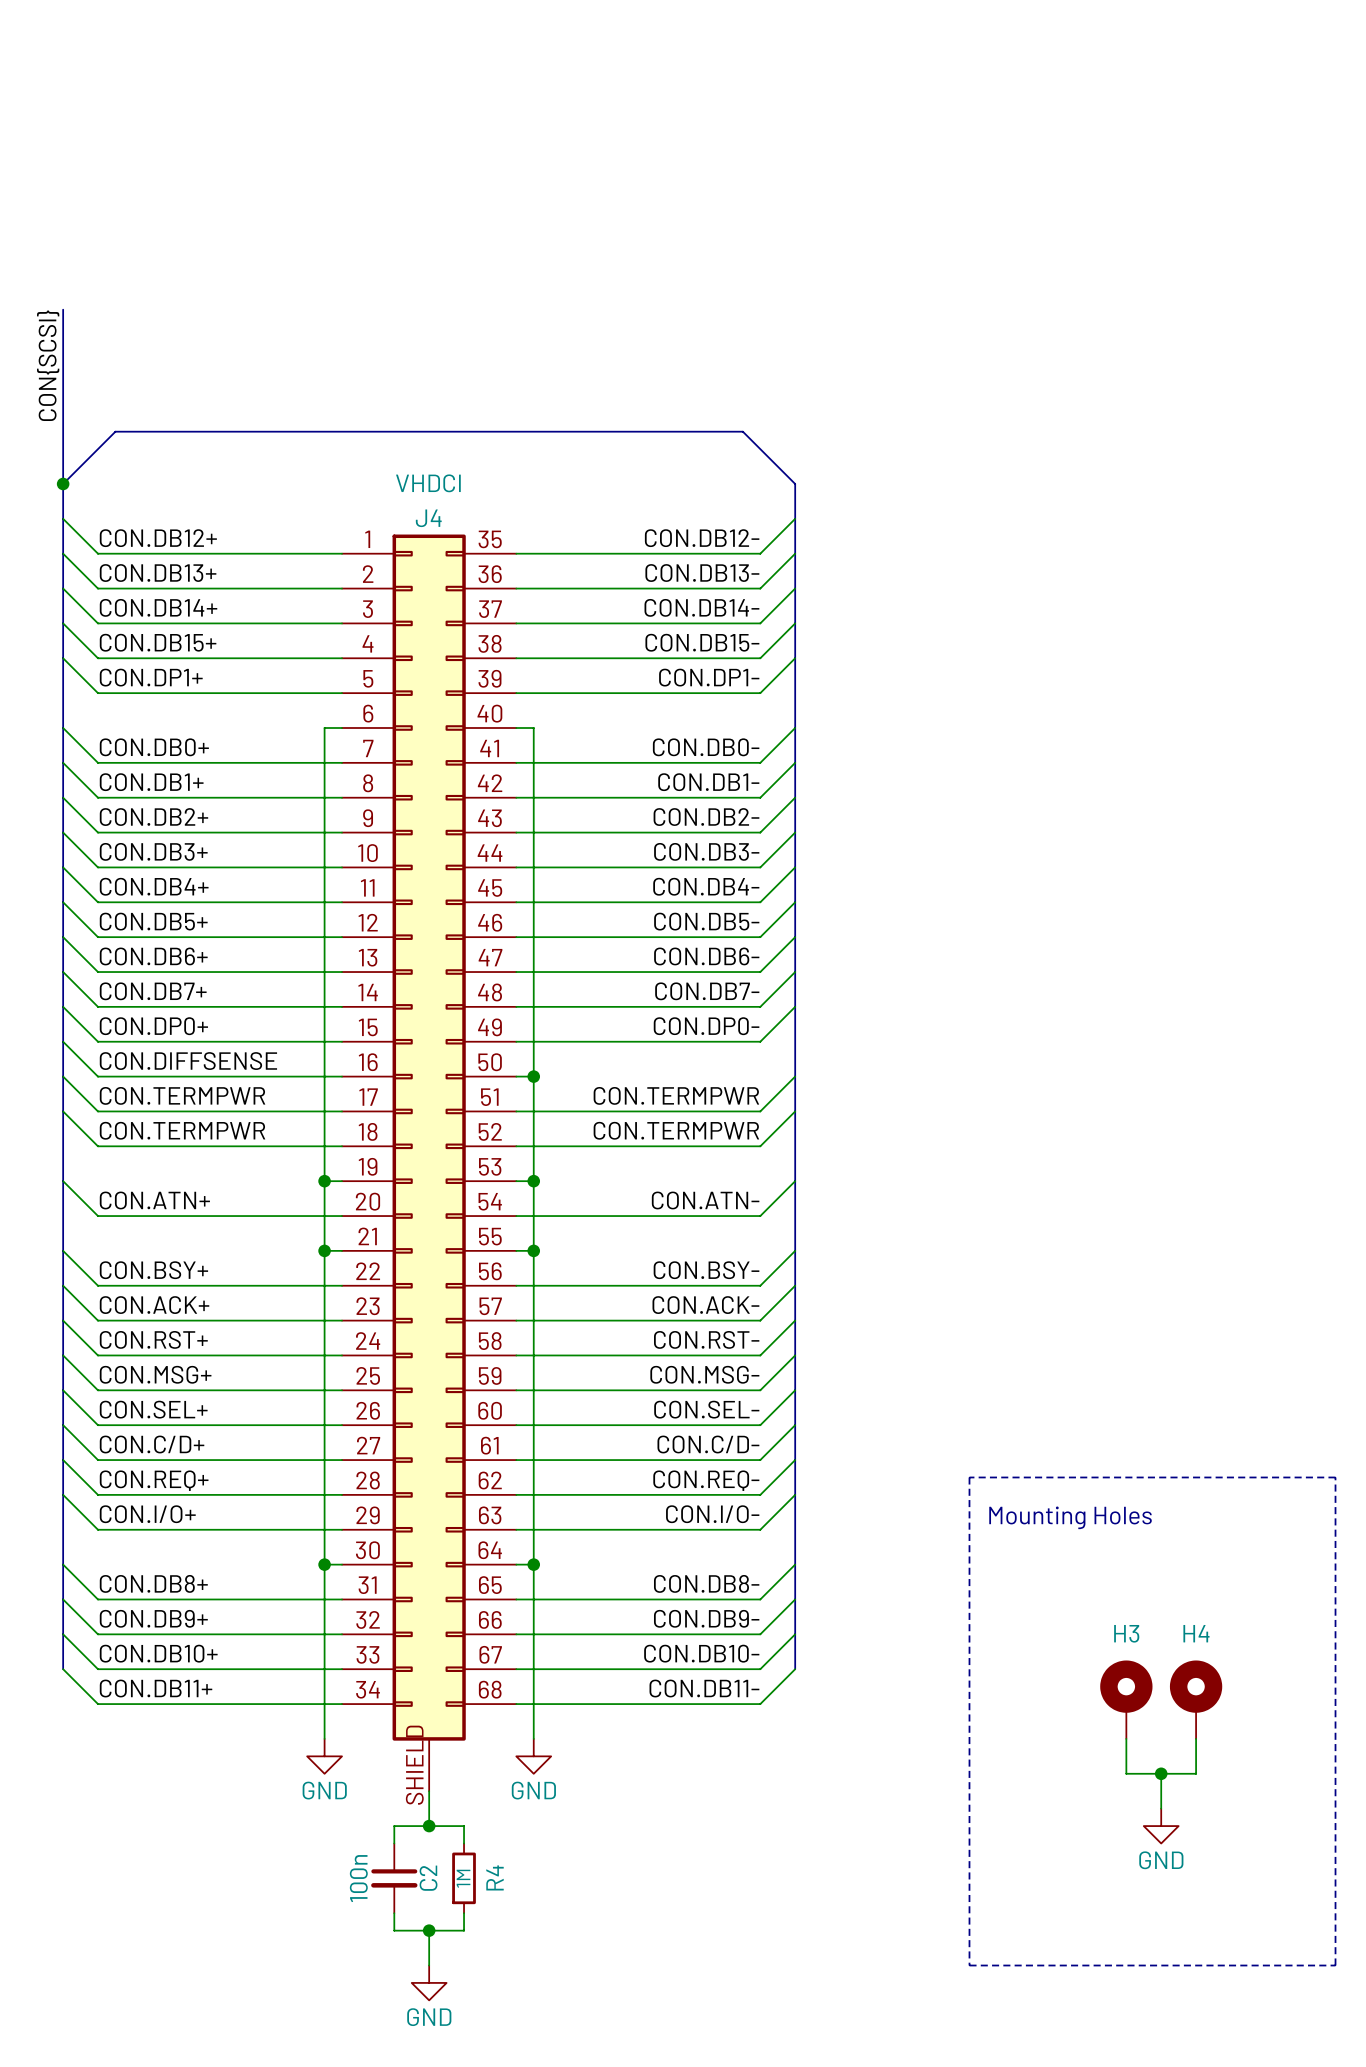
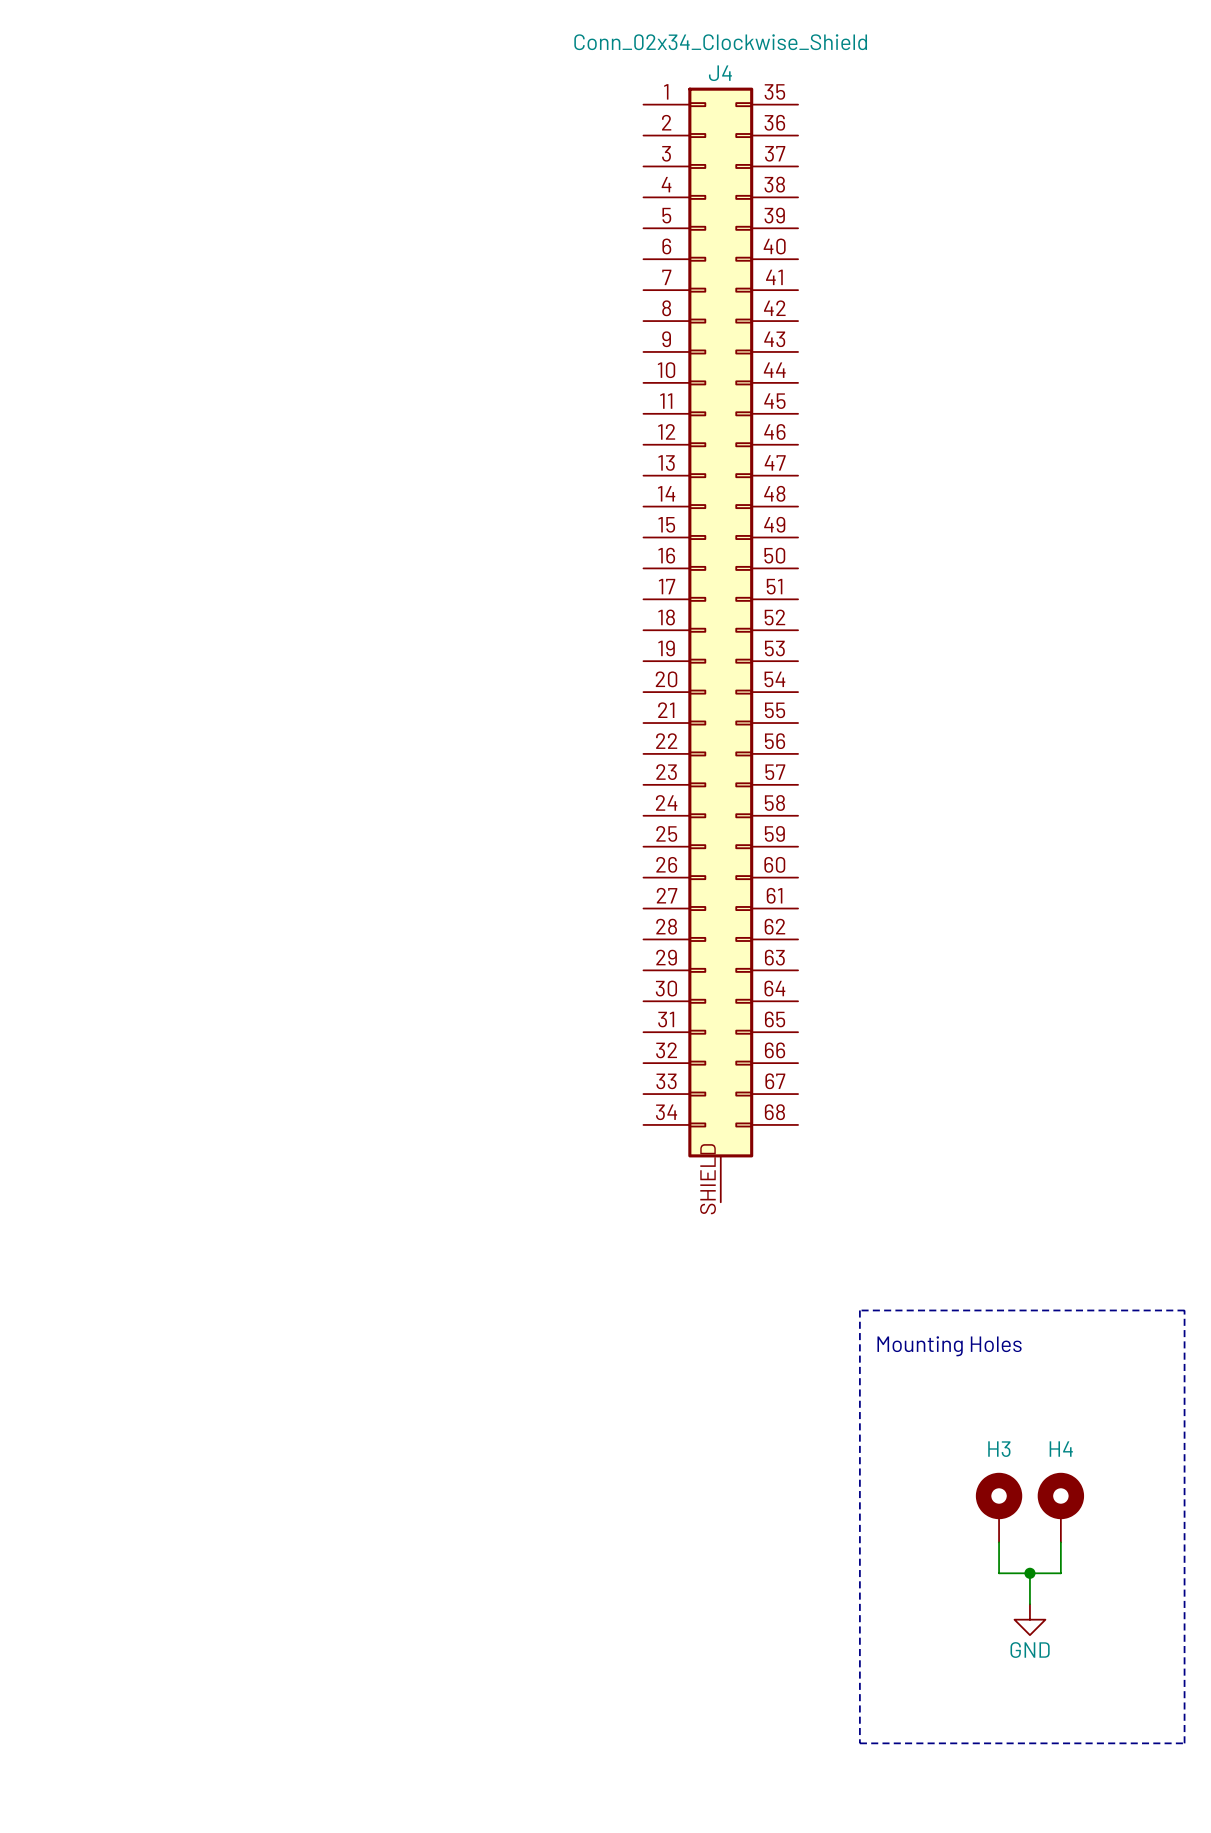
bus: (63, 309) (63, 1669) -> none
label: CON{SCSI} (48, 365) -> none
bus: (63, 483) (115, 431) (742, 431) (795, 483) (795, 1669) -> none
junction: (63, 483) -> none
J4 value: VHDCI (428, 483) -> Conn_02x34_Clockwise_Shield (720, 42)
wire: (63, 518) (98, 553) (342, 553) -> none
wire: (795, 518) (760, 553) (516, 553) -> none
label: CON.DB12+ (158, 538) -> none
label: CON.DB12- (702, 538) -> none
wire: (63, 553) (98, 588) (342, 588) -> none
wire: (795, 553) (760, 588) (516, 588) -> none
label: CON.DB13+ (158, 573) -> none
label: CON.DB13- (702, 573) -> none
wire: (63, 588) (98, 623) (342, 623) -> none
wire: (795, 588) (760, 623) (516, 623) -> none
label: CON.DB14+ (158, 607) -> none
label: CON.DB14- (701, 607) -> none
wire: (63, 623) (98, 658) (342, 658) -> none
wire: (795, 623) (760, 658) (516, 658) -> none
label: CON.DB15+ (158, 642) -> none
label: CON.DB15- (702, 642) -> none
wire: (63, 658) (98, 693) (342, 693) -> none
wire: (795, 658) (760, 693) (516, 693) -> none
label: CON.DP1+ (151, 677) -> none
label: CON.DP1- (709, 677) -> none
wire: (63, 727) (98, 762) (342, 762) -> none
wire: (342, 727) (324, 727) (324, 1738) -> none
wire: (516, 727) (533, 727) (533, 1738) -> none
wire: (795, 727) (760, 762) (516, 762) -> none
label: CON.DB0+ (154, 747) -> none
label: CON.DB0- (706, 747) -> none
wire: (63, 762) (98, 797) (342, 797) -> none
wire: (795, 762) (760, 797) (516, 797) -> none
label: CON.DB1+ (151, 782) -> none
label: CON.DB1- (708, 782) -> none
wire: (63, 797) (98, 832) (342, 832) -> none
wire: (795, 797) (760, 832) (516, 832) -> none
label: CON.DB2+ (153, 817) -> none
label: CON.DB2- (706, 817) -> none
wire: (63, 832) (98, 867) (342, 867) -> none
wire: (795, 832) (760, 867) (516, 867) -> none
label: CON.DB3+ (153, 851) -> none
label: CON.DB3- (706, 851) -> none
wire: (63, 867) (98, 902) (342, 902) -> none
wire: (795, 867) (760, 902) (516, 902) -> none
label: CON.DB4+ (154, 886) -> none
label: CON.DB4- (706, 886) -> none
wire: (63, 902) (98, 937) (342, 937) -> none
wire: (795, 902) (760, 937) (516, 937) -> none
label: CON.DB5+ (153, 921) -> none
label: CON.DB5- (706, 921) -> none
wire: (63, 937) (98, 972) (342, 972) -> none
wire: (795, 937) (760, 972) (516, 972) -> none
label: CON.DB6+ (153, 956) -> none
label: CON.DB6- (706, 956) -> none
wire: (63, 972) (98, 1006) (342, 1006) -> none
wire: (795, 972) (760, 1006) (516, 1006) -> none
label: CON.DB7+ (153, 991) -> none
label: CON.DB7- (707, 991) -> none
wire: (63, 1006) (98, 1041) (342, 1041) -> none
wire: (795, 1006) (760, 1041) (516, 1041) -> none
label: CON.DP0+ (153, 1026) -> none
label: CON.DP0- (706, 1026) -> none
wire: (63, 1041) (98, 1076) (342, 1076) -> none
label: CON.DIFFSENSE (188, 1061) -> none
wire: (63, 1076) (98, 1111) (342, 1111) -> none
wire: (516, 1076) (533, 1076) -> none
junction: (533, 1076) -> none
wire: (795, 1076) (760, 1111) (516, 1111) -> none
label: CON.TERMPWR (182, 1095) -> none
label: CON.TERMPWR (676, 1095) -> none
wire: (63, 1111) (98, 1146) (342, 1146) -> none
wire: (795, 1111) (760, 1146) (516, 1146) -> none
label: CON.TERMPWR (182, 1130) -> none
label: CON.TERMPWR (676, 1130) -> none
J4 position: (429, 1162) -> (720, 644)
wire: (63, 1181) (98, 1216) (342, 1216) -> none
wire: (324, 1181) (342, 1181) -> none
junction: (324, 1181) -> none
wire: (516, 1181) (533, 1181) -> none
junction: (533, 1181) -> none
wire: (795, 1181) (760, 1216) (516, 1216) -> none
label: CON.ATN+ (154, 1200) -> none
label: CON.ATN- (705, 1200) -> none
wire: (63, 1250) (98, 1285) (342, 1285) -> none
wire: (324, 1250) (342, 1250) -> none
junction: (324, 1250) -> none
wire: (516, 1250) (533, 1250) -> none
junction: (533, 1250) -> none
wire: (795, 1250) (760, 1285) (516, 1285) -> none
label: CON.BSY+ (153, 1270) -> none
label: CON.BSY- (706, 1270) -> none
wire: (63, 1285) (98, 1320) (342, 1320) -> none
wire: (795, 1285) (760, 1320) (516, 1320) -> none
label: CON.ACK+ (154, 1305) -> none
label: CON.ACK- (705, 1305) -> none
wire: (63, 1320) (98, 1355) (342, 1355) -> none
wire: (795, 1320) (760, 1355) (516, 1355) -> none
label: CON.RST+ (153, 1339) -> none
label: CON.RST- (706, 1339) -> none
wire: (63, 1355) (98, 1390) (342, 1390) -> none
wire: (795, 1355) (760, 1390) (516, 1390) -> none
label: CON.MSG+ (155, 1374) -> none
label: CON.MSG- (704, 1374) -> none
wire: (63, 1390) (98, 1425) (342, 1425) -> none
wire: (795, 1390) (760, 1425) (516, 1425) -> none
label: CON.SEL+ (153, 1409) -> none
label: CON.SEL- (706, 1409) -> none
wire: (63, 1425) (98, 1460) (342, 1460) -> none
wire: (795, 1425) (760, 1460) (516, 1460) -> none
label: CON.C/D+ (152, 1444) -> none
label: CON.C/D- (708, 1444) -> none
wire: (63, 1460) (98, 1494) (342, 1494) -> none
wire: (795, 1460) (760, 1494) (516, 1494) -> none
label: CON.REQ+ (154, 1480) -> none
label: CON.REQ- (706, 1480) -> none
wire: (63, 1494) (98, 1529) (342, 1529) -> none
wire: (795, 1494) (760, 1529) (516, 1529) -> none
label: CON.I/O+ (147, 1514) -> none
label: CON.I/O- (712, 1514) -> none
wire: (63, 1564) (98, 1599) (342, 1599) -> none
wire: (324, 1564) (342, 1564) -> none
junction: (324, 1564) -> none
wire: (516, 1564) (533, 1564) -> none
junction: (533, 1564) -> none
wire: (795, 1564) (760, 1599) (516, 1599) -> none
label: CON.DB8+ (153, 1583) -> none
label: CON.DB8- (706, 1583) -> none
wire: (63, 1599) (98, 1634) (342, 1634) -> none
wire: (795, 1599) (760, 1634) (516, 1634) -> none
label: CON.DB9+ (153, 1618) -> none
label: CON.DB9- (706, 1618) -> none
wire: (63, 1634) (98, 1669) (342, 1669) -> none
wire: (795, 1634) (760, 1669) (516, 1669) -> none
label: CON.DB10+ (158, 1653) -> none
label: CON.DB10- (701, 1653) -> none
wire: (63, 1669) (98, 1704) (342, 1704) -> none
wire: (795, 1669) (760, 1704) (516, 1704) -> none
label: CON.DB11+ (156, 1688) -> none
label: CON.DB11- (704, 1688) -> none
power symbol: GND (324, 1756) -> none
power symbol: GND (533, 1756) -> none
wire: (429, 1791) (429, 1826) -> none
junction: (429, 1826) -> none
wire: (394, 1843) (394, 1826) (464, 1826) (464, 1843) -> none
C2: 100n (394, 1878) -> none
R4: 1M (464, 1878) -> none
wire: (394, 1913) (394, 1930) (464, 1930) (464, 1913) -> none
wire: (429, 1930) (429, 1965) -> none
junction: (429, 1930) -> none
power symbol: GND (429, 1982) -> none

